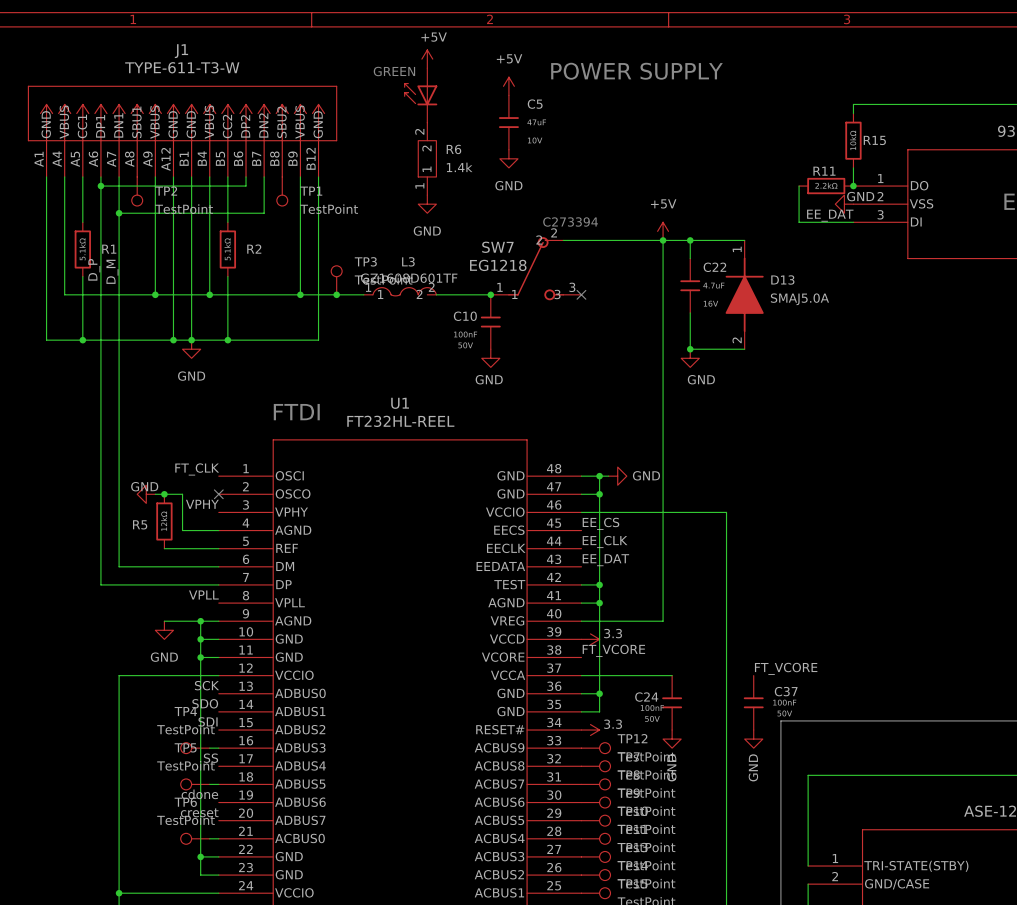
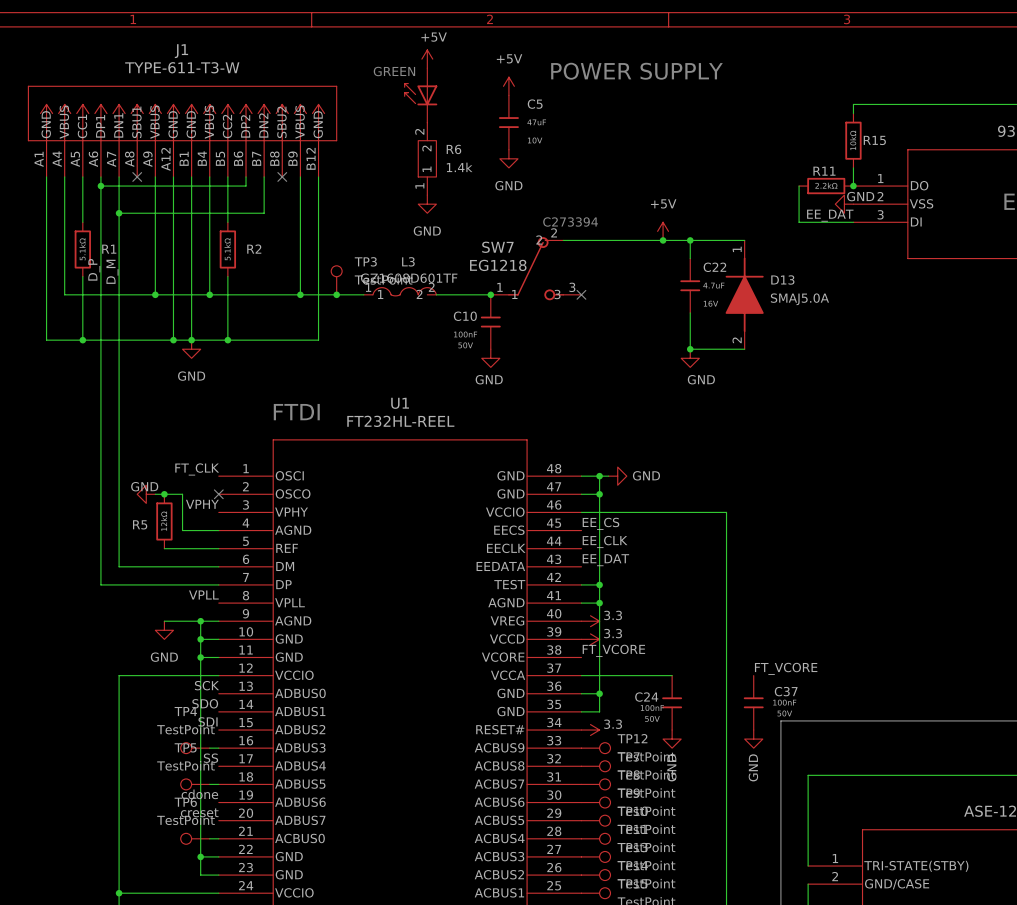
no-connect mark: none -> (137, 176)
no-connect mark: none -> (282, 176)
TP2: TestPoint (137, 191) -> none
TP1: TestPoint (282, 191) -> none
wire: (663, 240) (663, 621) (581, 621) -> none
power symbol: none -> 3.3 (590, 621)

